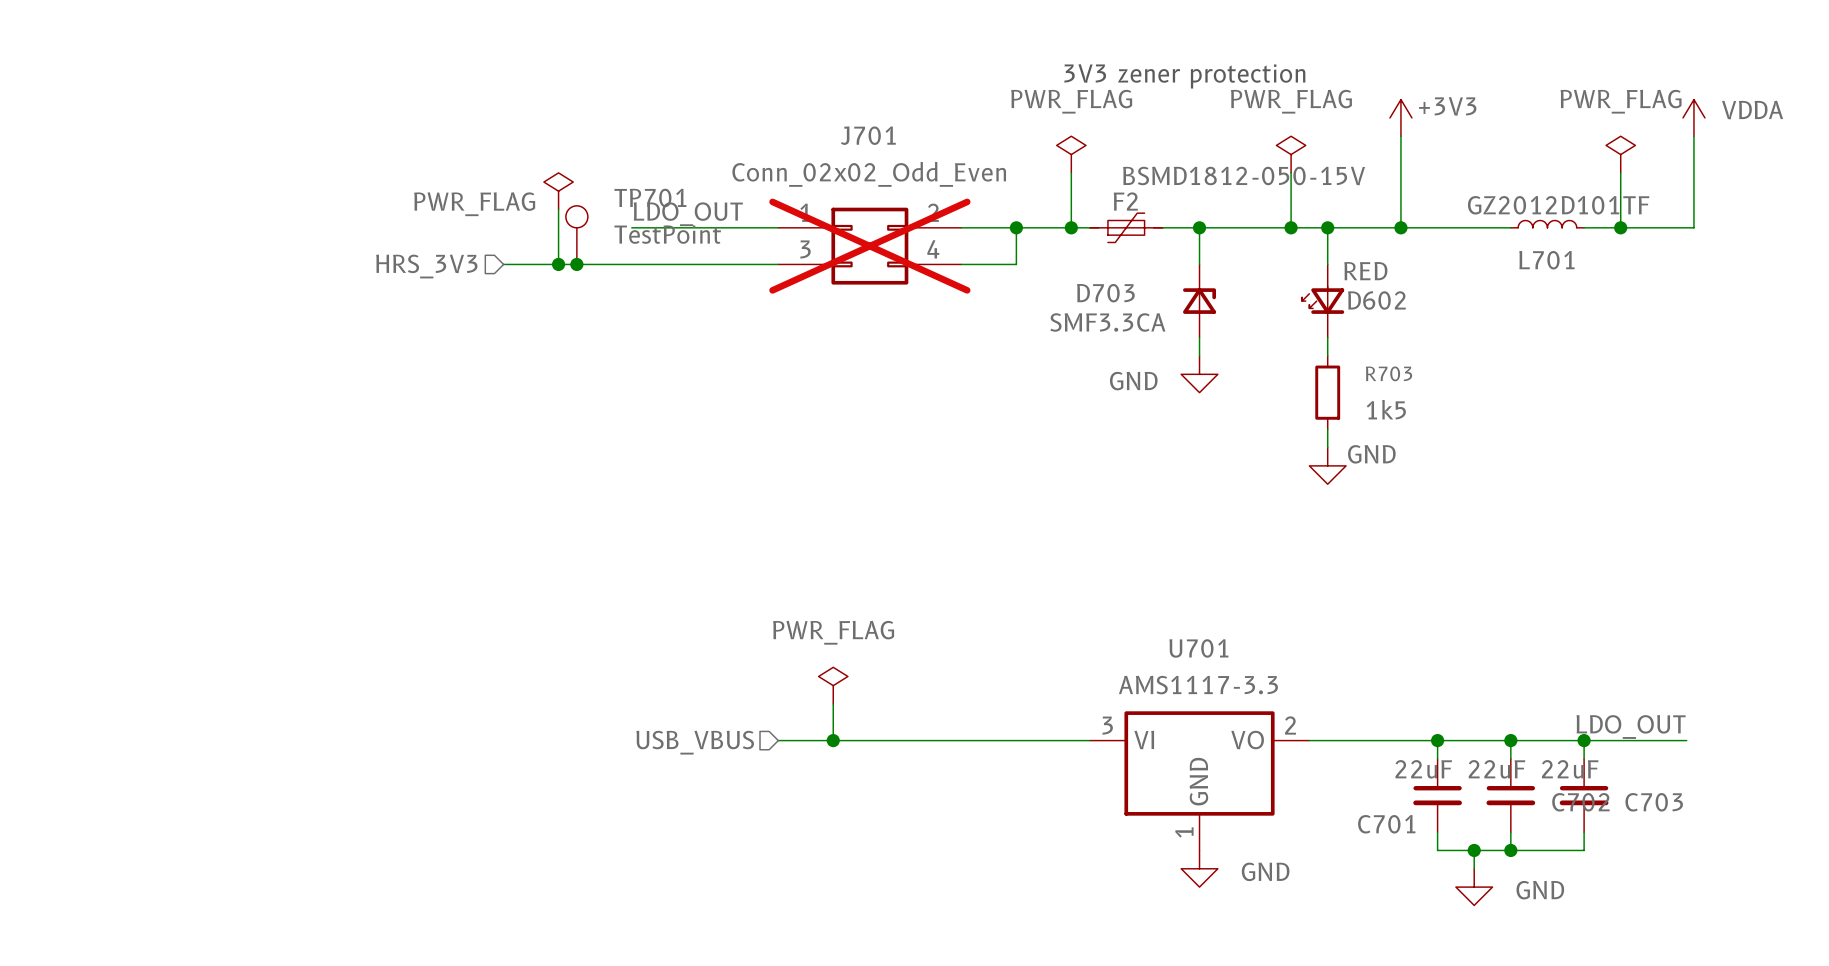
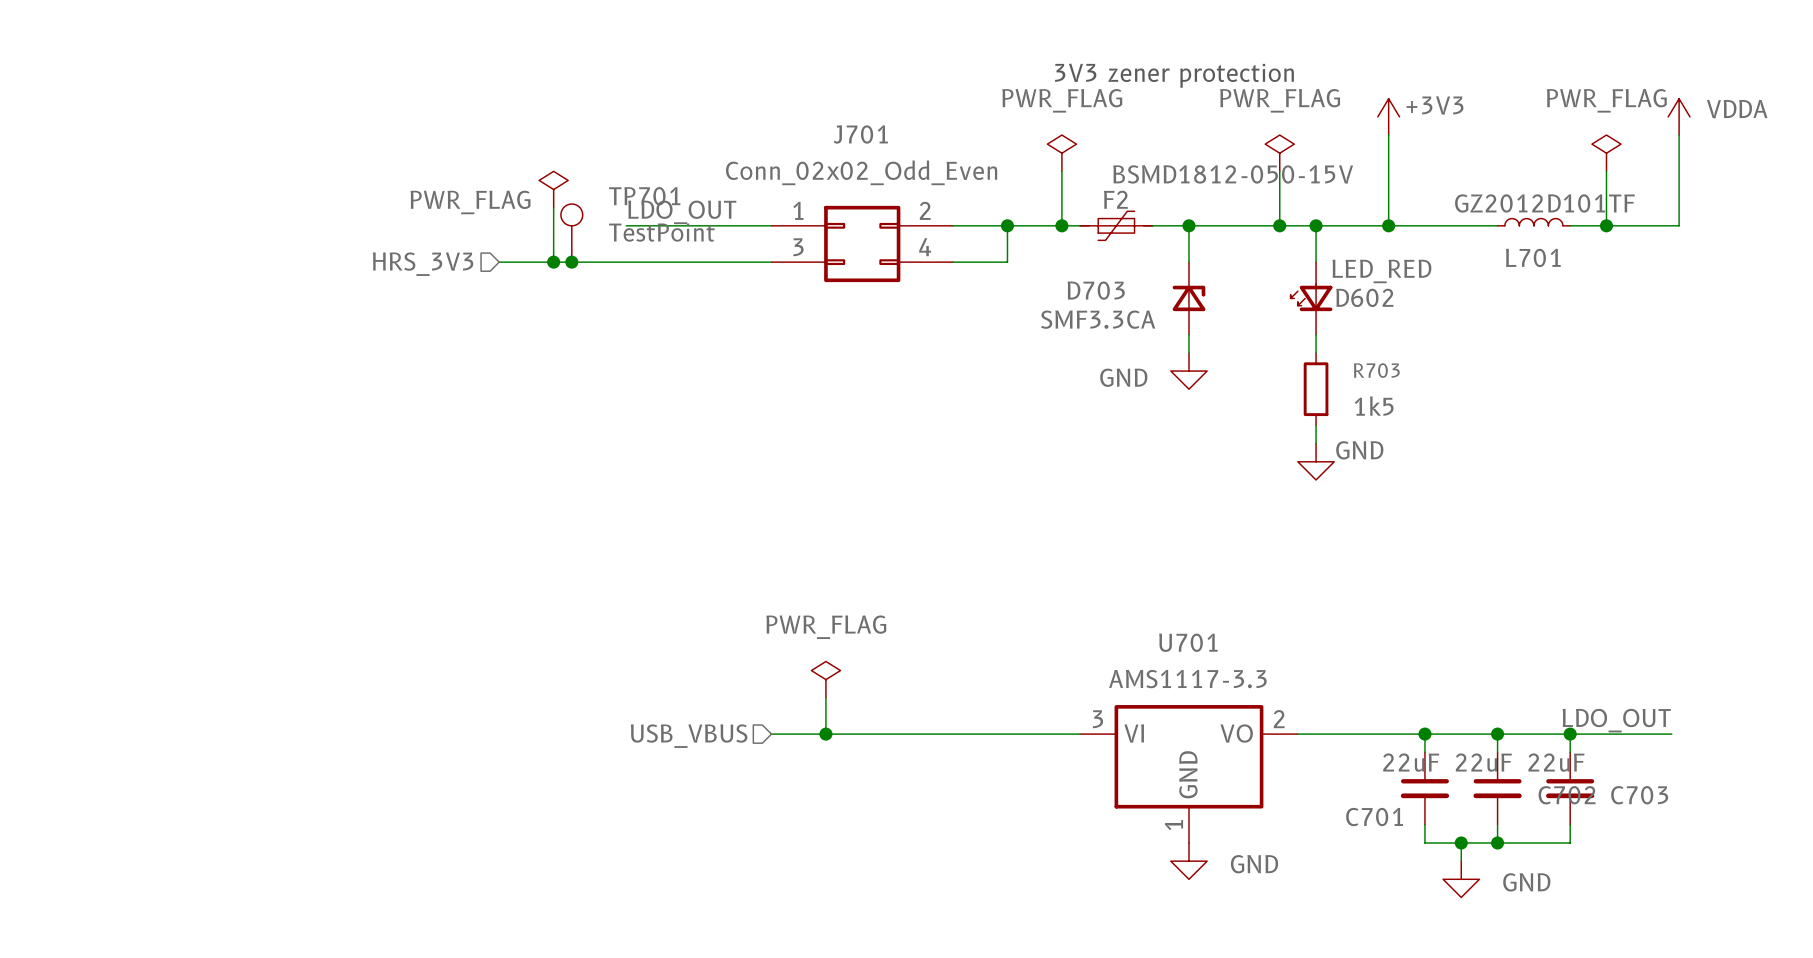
J701 do-not-place cross: (869, 246) -> none
D602 value: RED (1365, 271) -> LED_RED (1381, 271)

